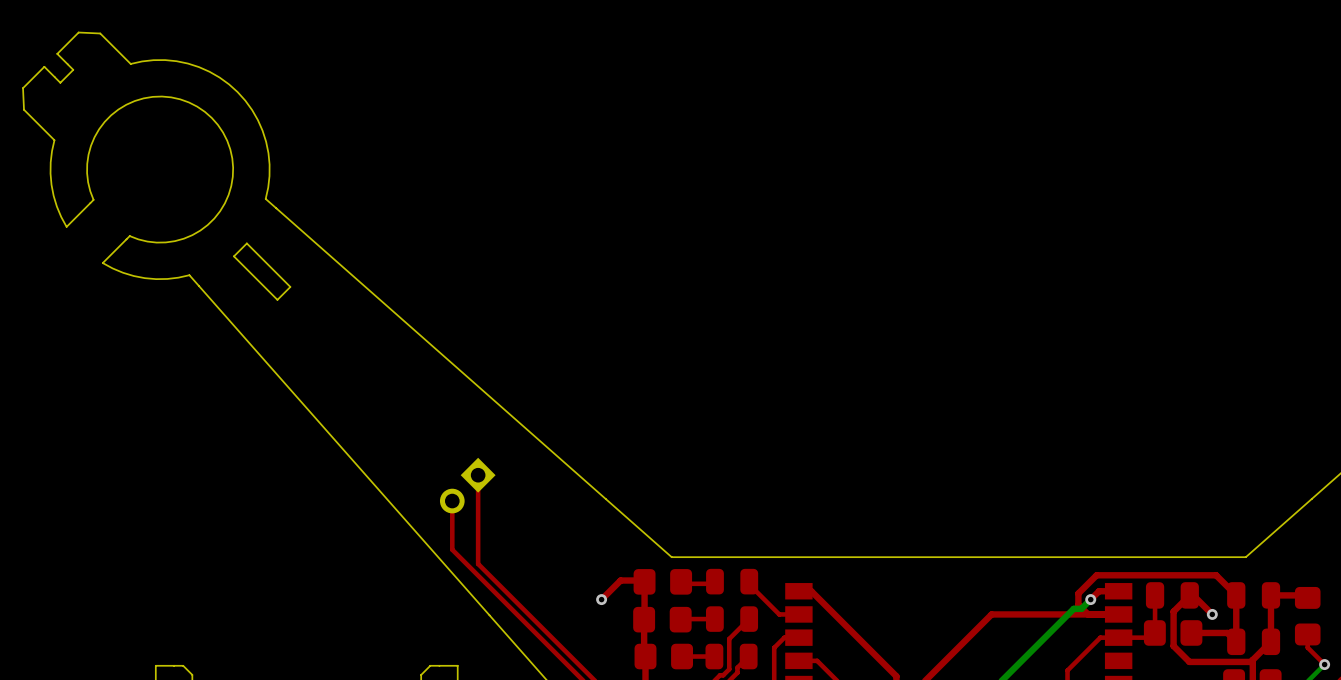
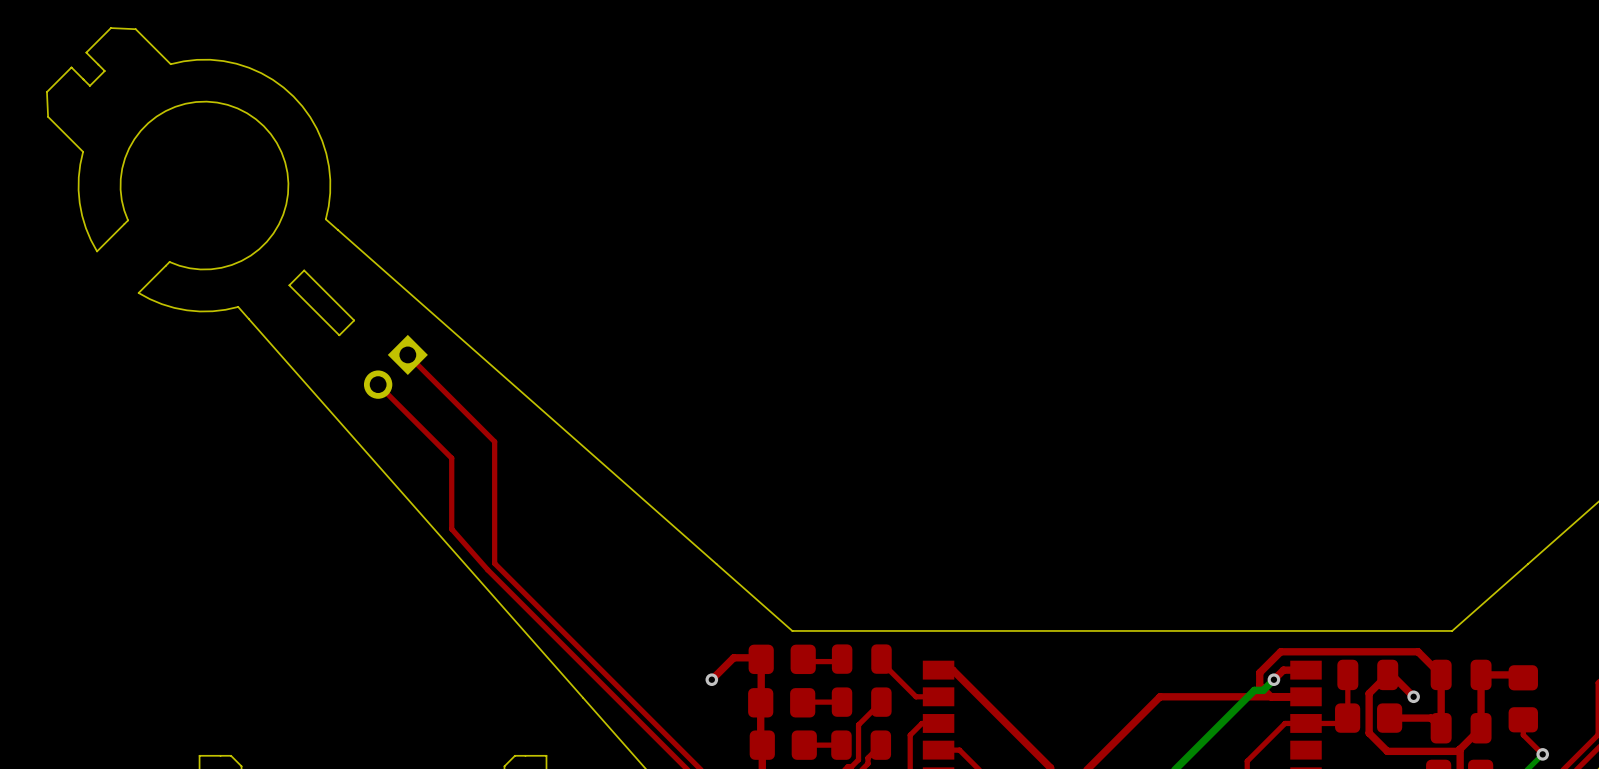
top track: (478, 475) (478, 563) -> (407, 354) (494, 441) (494, 563) (569, 638)
part position: (467, 485) -> (395, 366)
top track: (452, 501) (452, 549) -> (378, 384) (451, 458) (451, 529) (487, 569) (540, 622)

